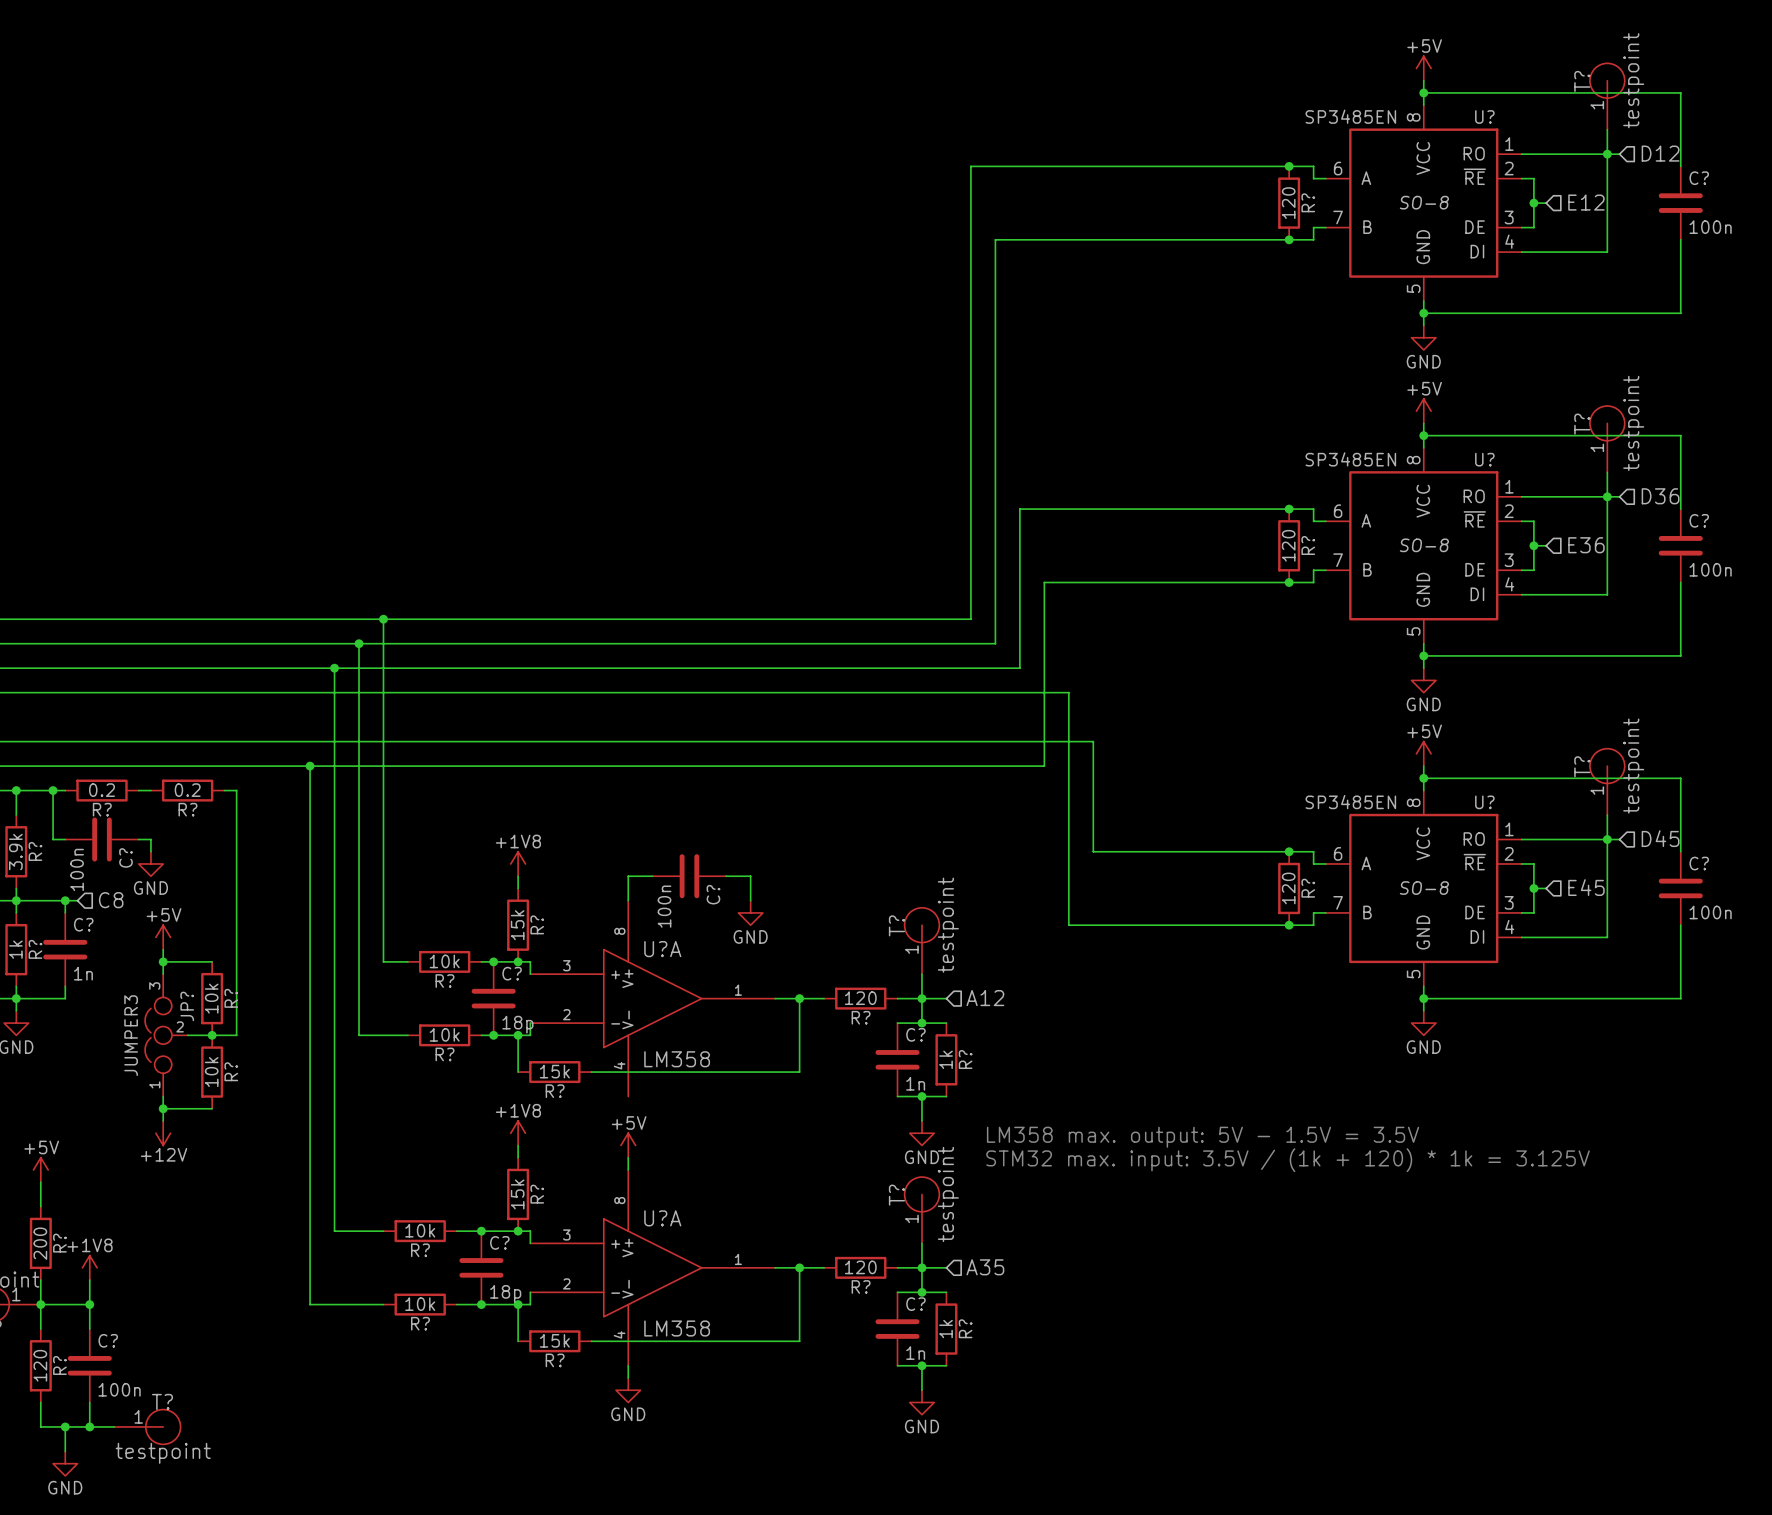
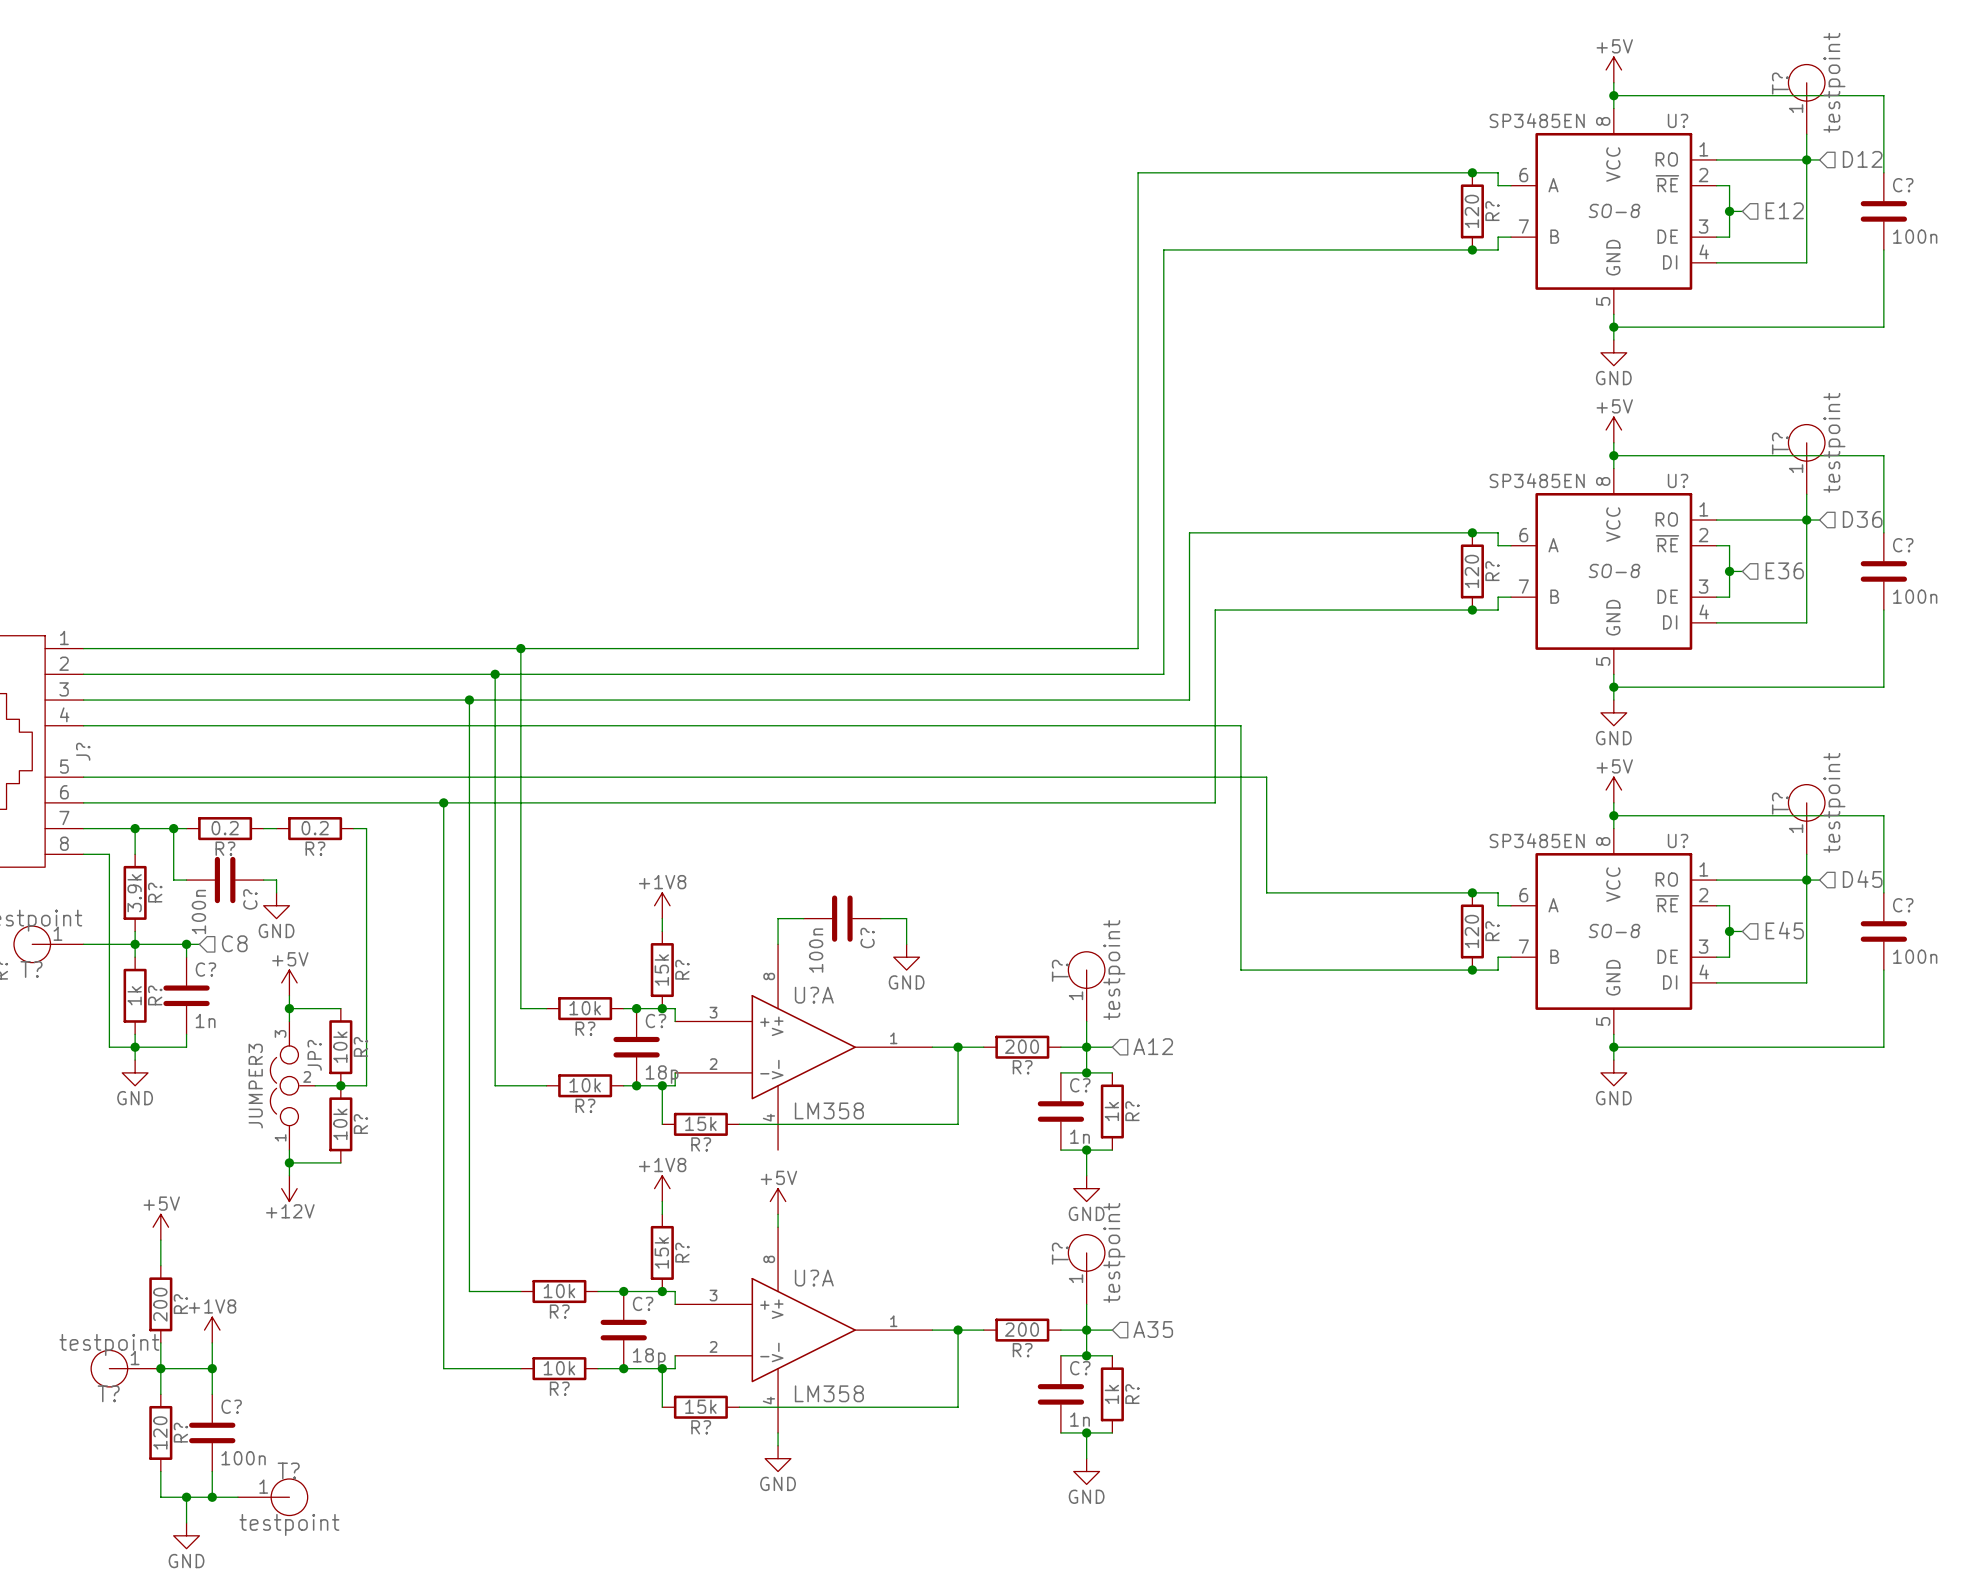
R? value: 120 (860, 998) -> 200 (1022, 1046)
text: LM358 max. output: 5V - 1.5V = 3.5V (1203, 1137) -> none
text: STM32 max. input: 3.5V / (1k + 120) * 1k = 3.125V (1288, 1160) -> none
R? value: 120 (860, 1267) -> 200 (1022, 1329)

